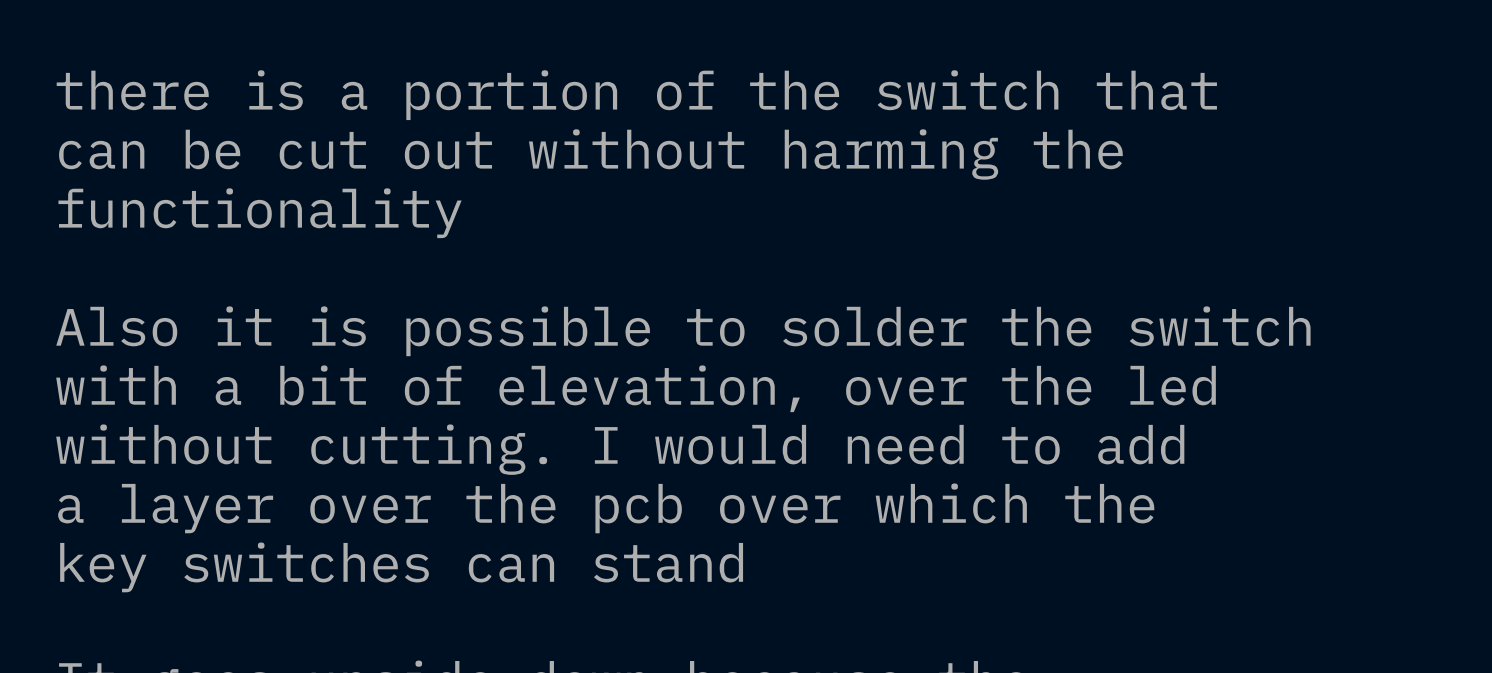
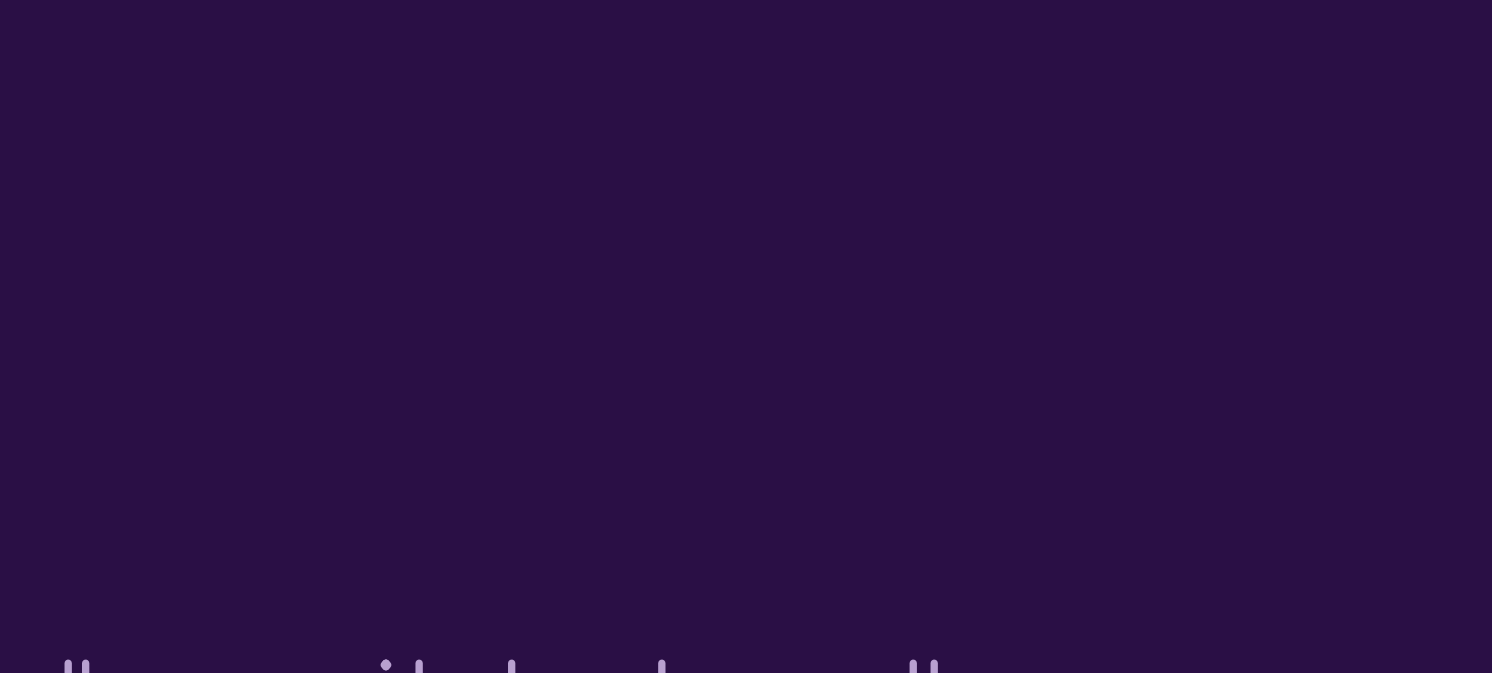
text: there is a portion of the switch that (636, 95) -> none
text: can be cut out without harming the (590, 154) -> none
text: functionality (260, 213) -> none
text: Also it is possible to solder the switch (683, 331) -> none
text: with a bit of elevation, over the led (636, 388) -> none
text: without cutting. I would need to add (620, 449) -> none
text: a layer over the pcb over which the (606, 508) -> none
text: key switches can stand (401, 567) -> none

